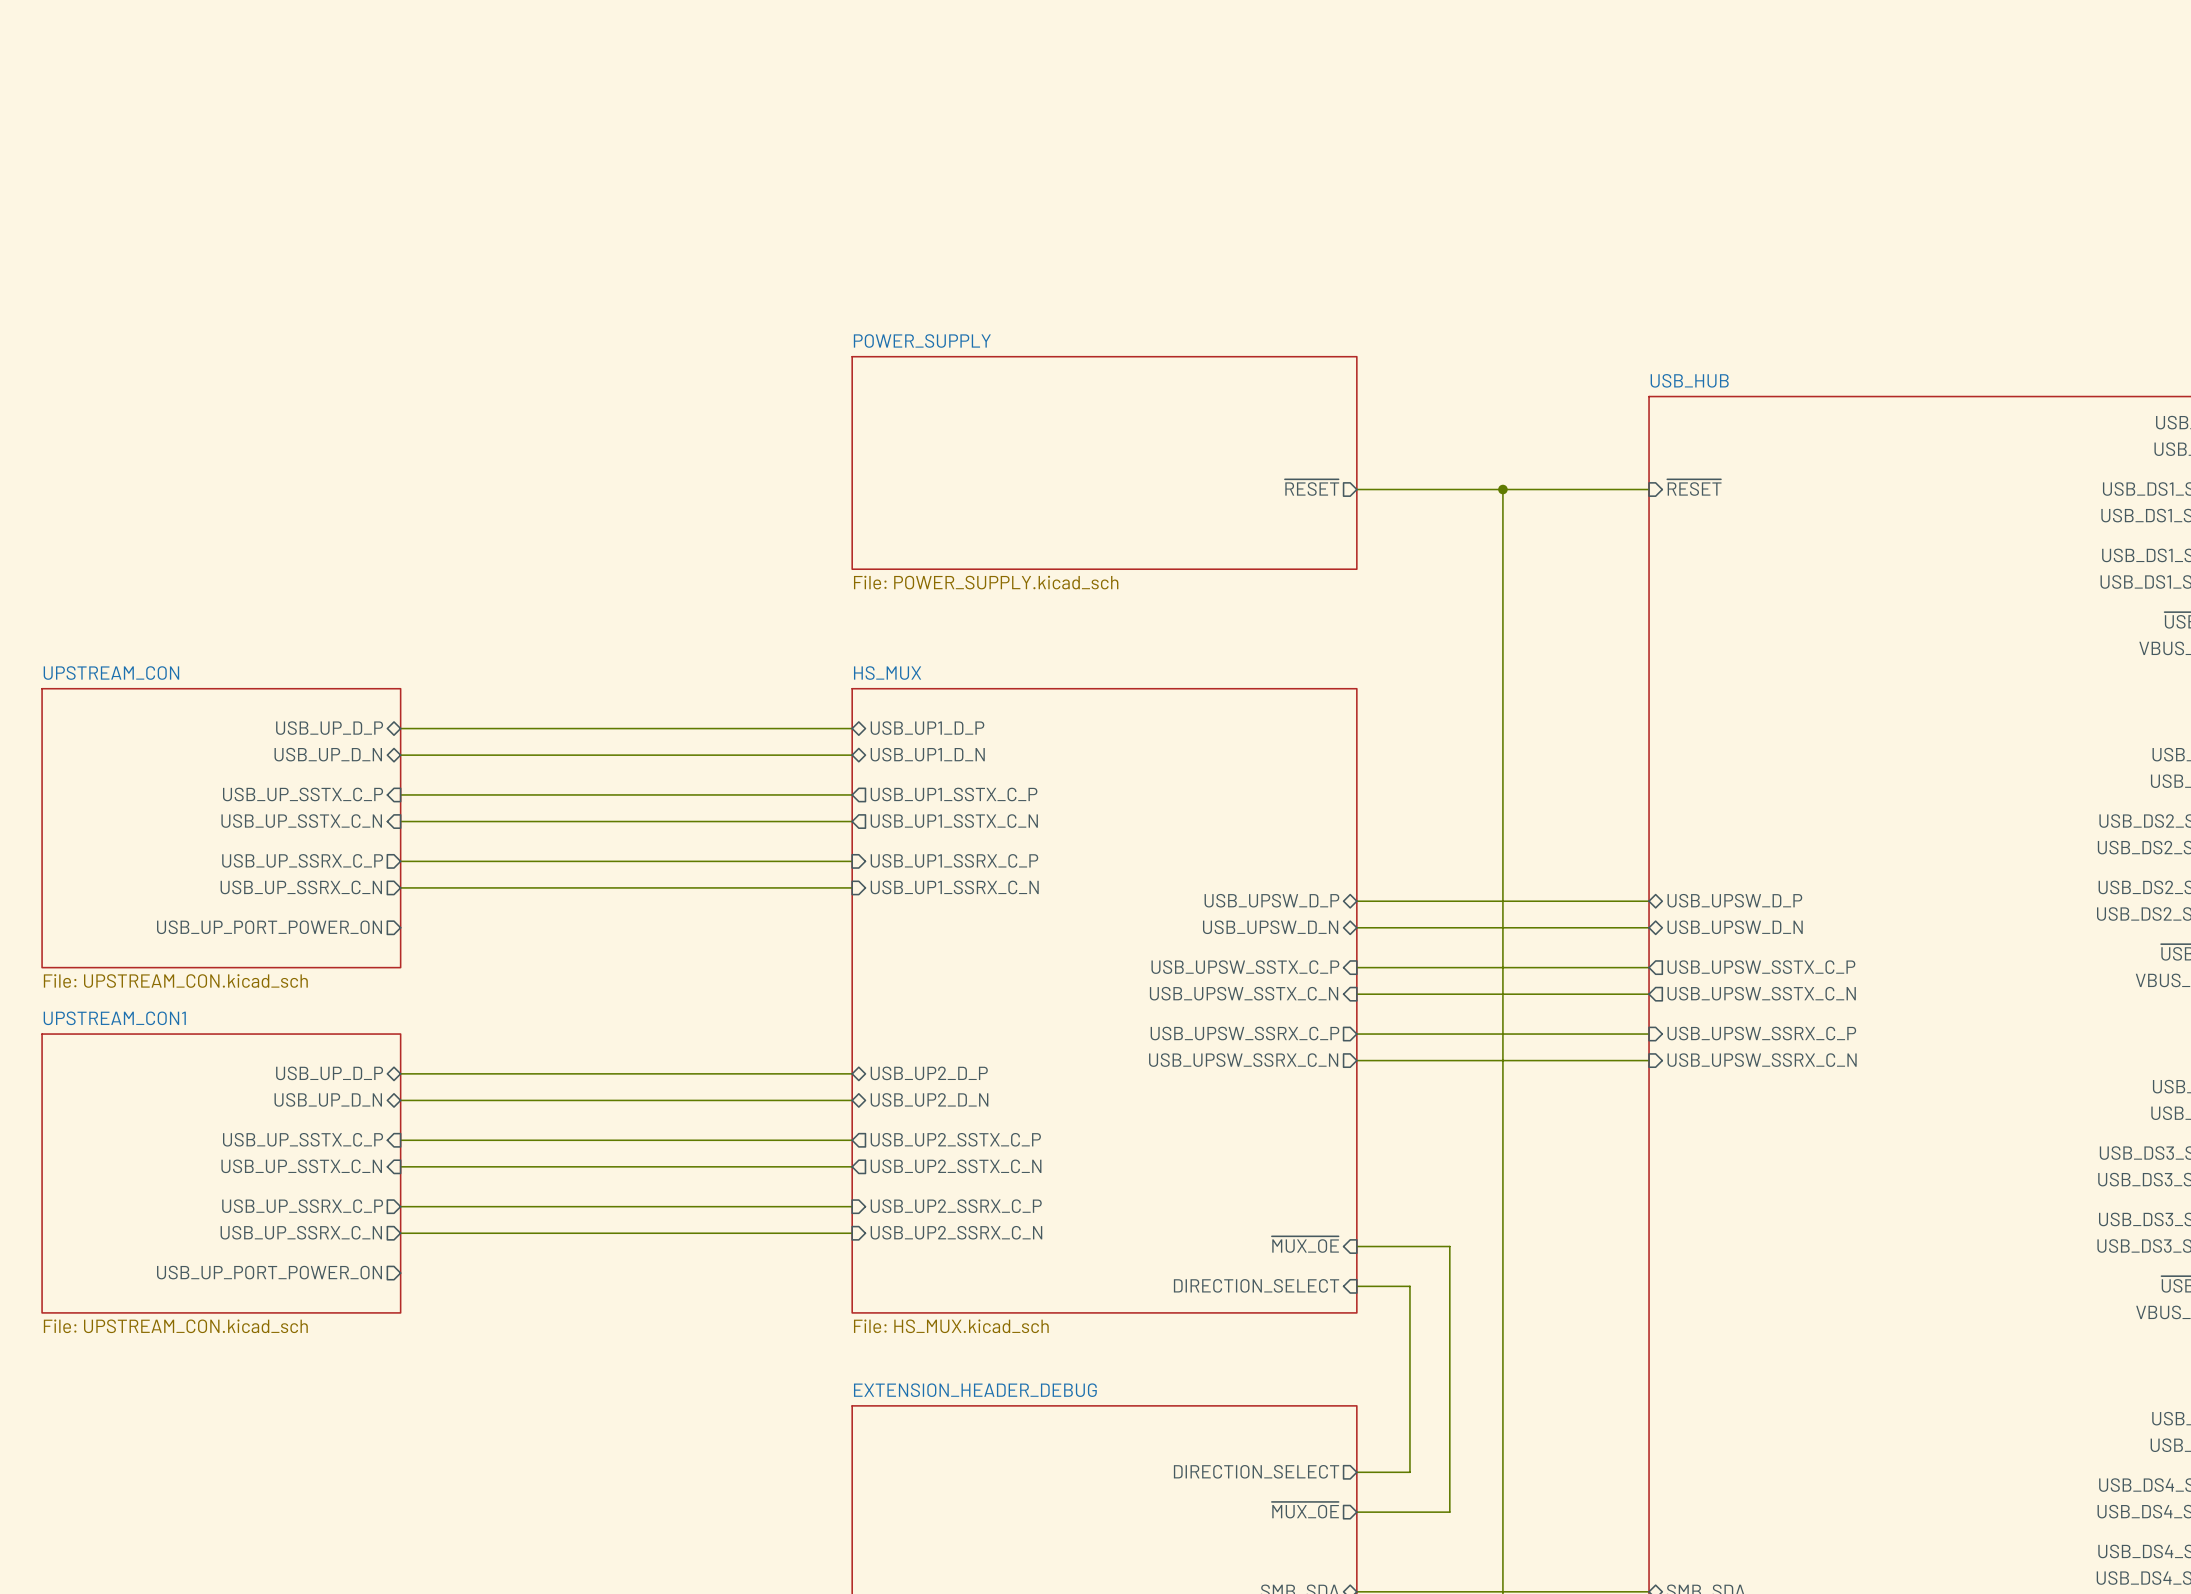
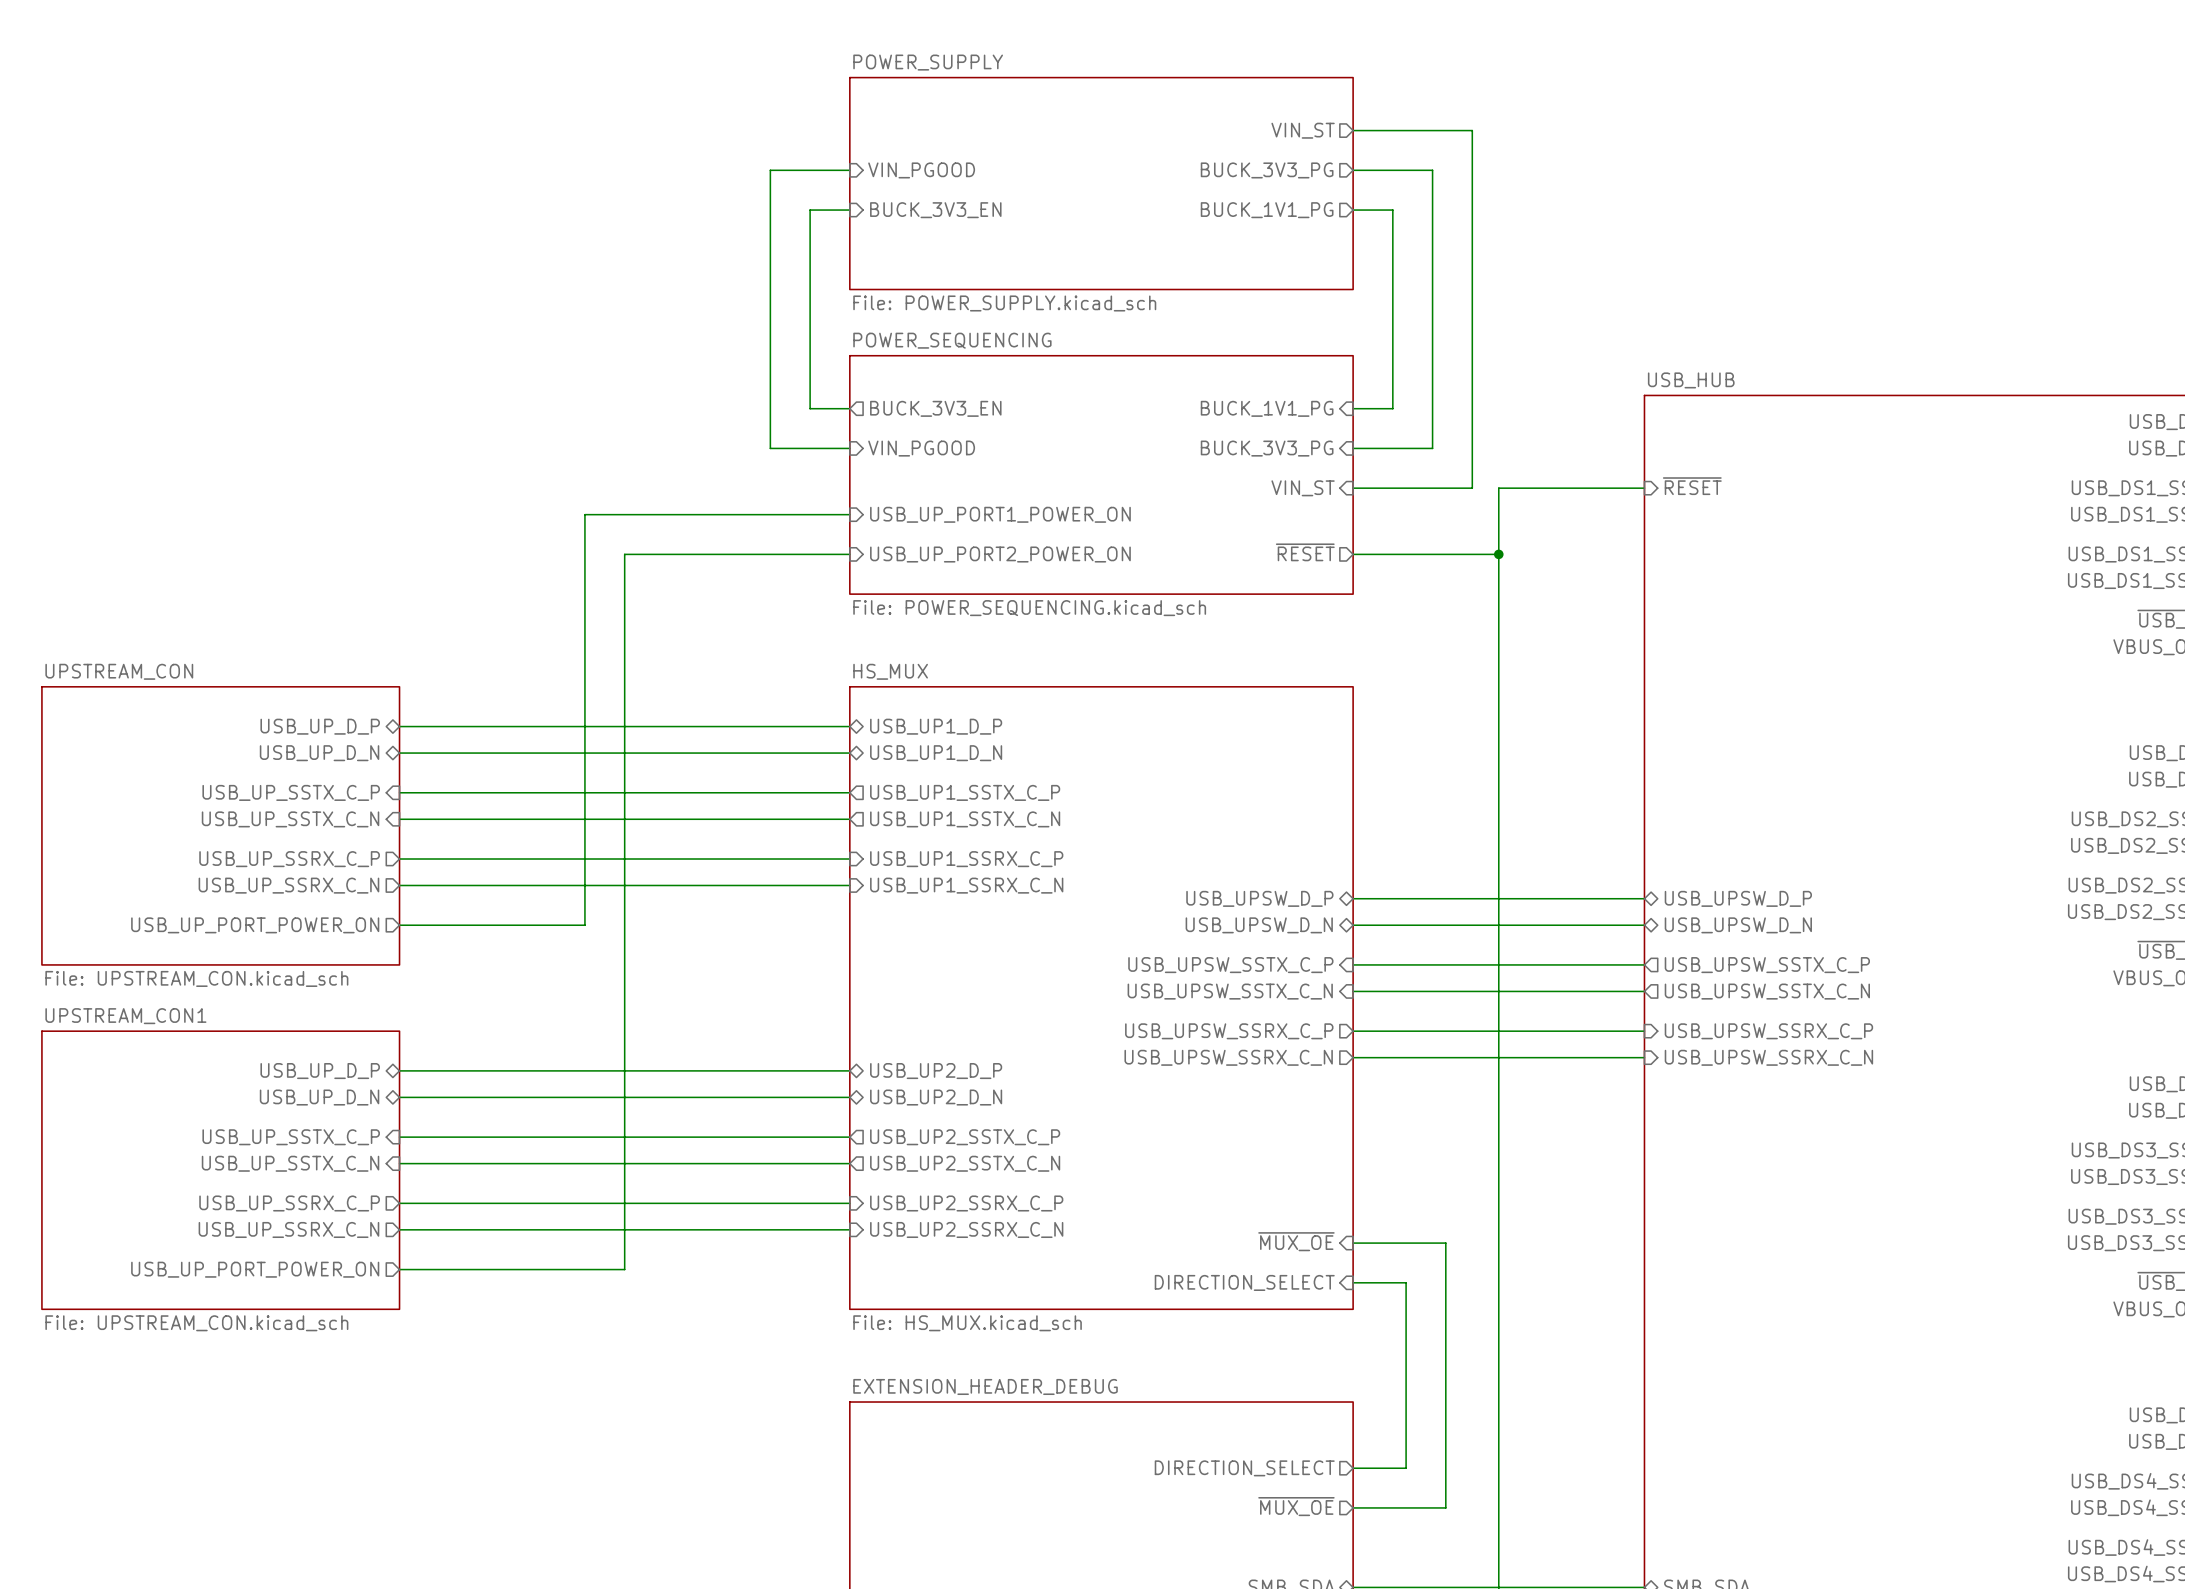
sheet pin: none -> VIN_ST (1303, 130)
wire: none -> (849, 170) (770, 170) (770, 448) (849, 448)
sheet pin: none -> VIN_PGOOD (921, 170)
sheet pin: none -> BUCK_3V3_PG (1267, 170)
wire: none -> (1353, 170) (1432, 170) (1432, 448) (1353, 448)
sheet POWER_SUPPLY: none -> File: POWER_SUPPLY.kicad_sch (1101, 183)
wire: none -> (849, 210) (810, 210) (810, 408) (849, 408)
sheet pin: none -> BUCK_3V3_EN (935, 210)
sheet pin: none -> BUCK_1V1_PG (1267, 210)
wire: none -> (1353, 210) (1392, 210) (1392, 408) (1353, 408)
sheet pin: none -> BUCK_3V3_EN (935, 408)
sheet pin: none -> BUCK_1V1_PG (1267, 408)
sheet pin: none -> VIN_PGOOD (921, 448)
sheet pin: none -> BUCK_3V3_PG (1267, 448)
sheet POWER_SUPPLY: File: POWER_SUPPLY.kicad_sch (1104, 462) -> none
sheet POWER_SEQUENCING: none -> File: POWER_SEQUENCING.kicad_sch (1101, 474)
sheet pin shape: output (1312, 487) -> input (1303, 488)
sheet pin: ~{RESET} (1312, 487) -> VIN_ST (1303, 488)
wire: (1476, 489) (1502, 489) -> (1472, 488) (1472, 130) (1353, 130)
junction: (1502, 489) -> none
sheet pin: none -> USB_UP_PORT1_POWER_ON (1000, 514)
wire: none -> (849, 514) (584, 514) (584, 925) (399, 925)
sheet pin: none -> ~{RESET} (1305, 552)
wire: none -> (849, 554) (624, 554) (624, 1269) (399, 1269)
sheet pin: none -> USB_UP_PORT2_POWER_ON (1000, 554)
wire: none -> (1353, 554) (1498, 554)
junction: none -> (1498, 554)

